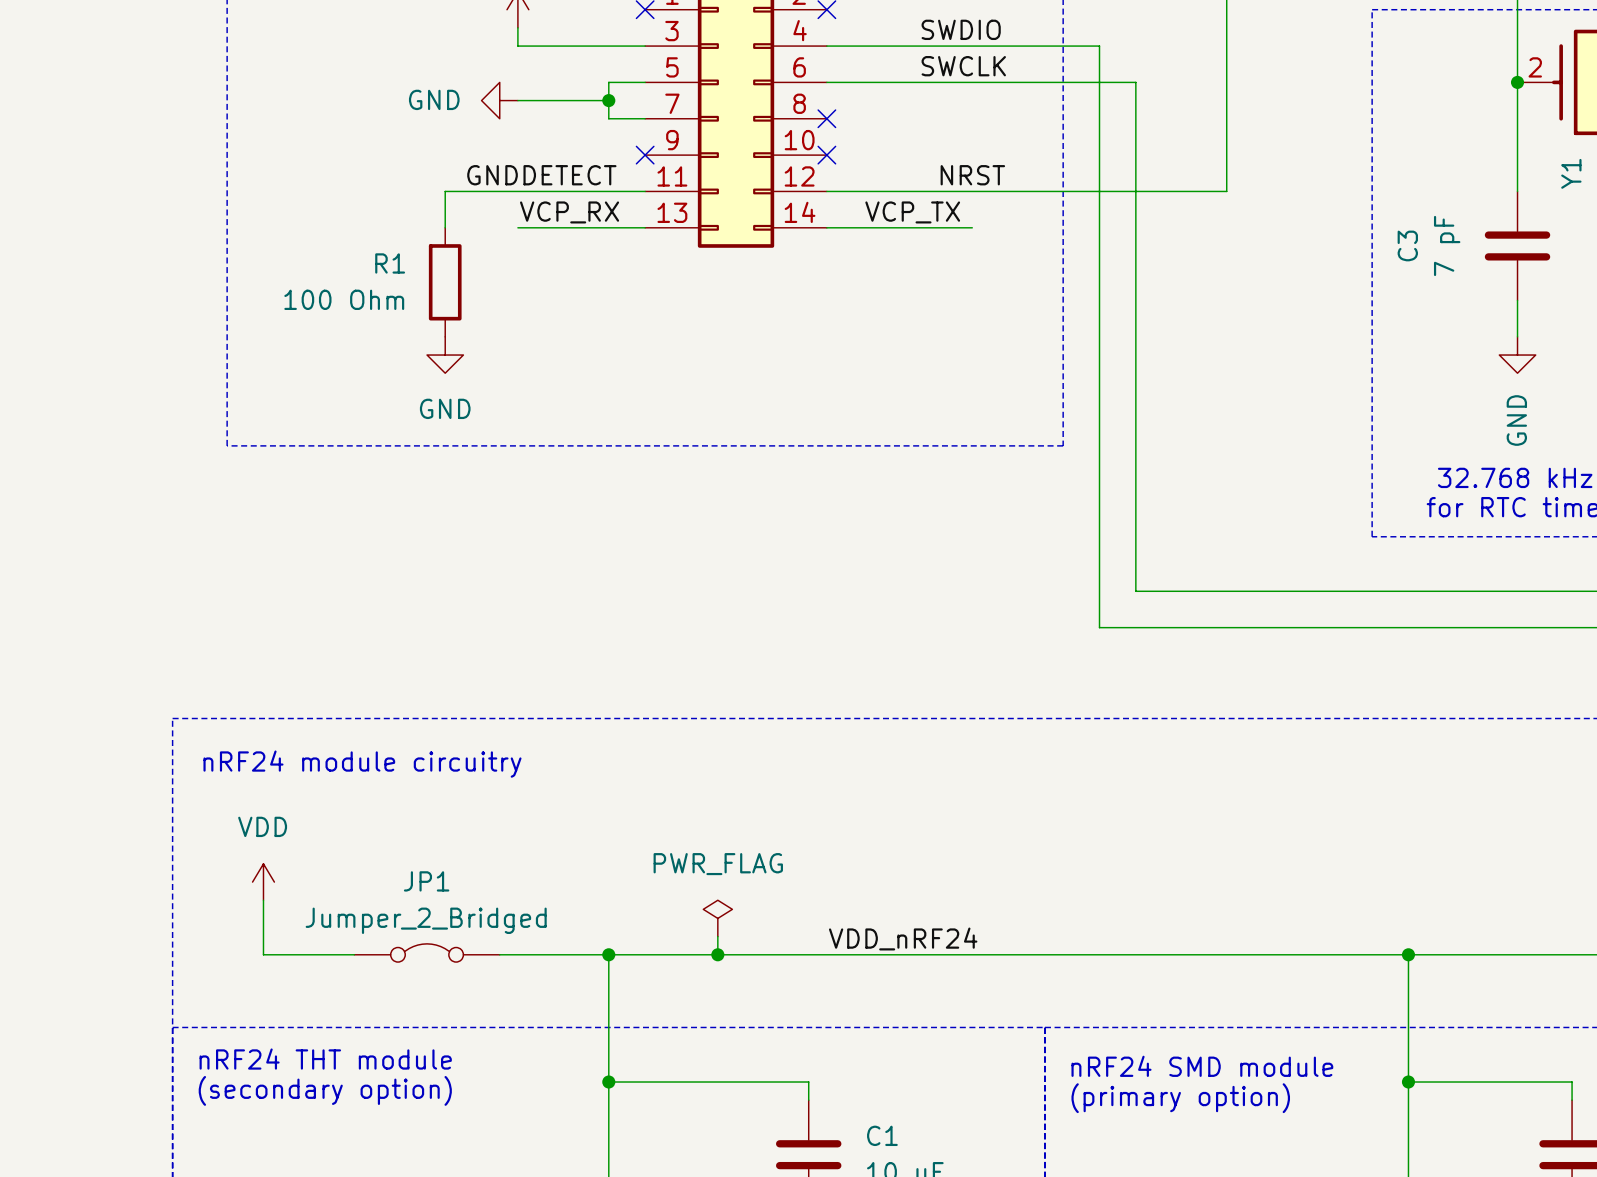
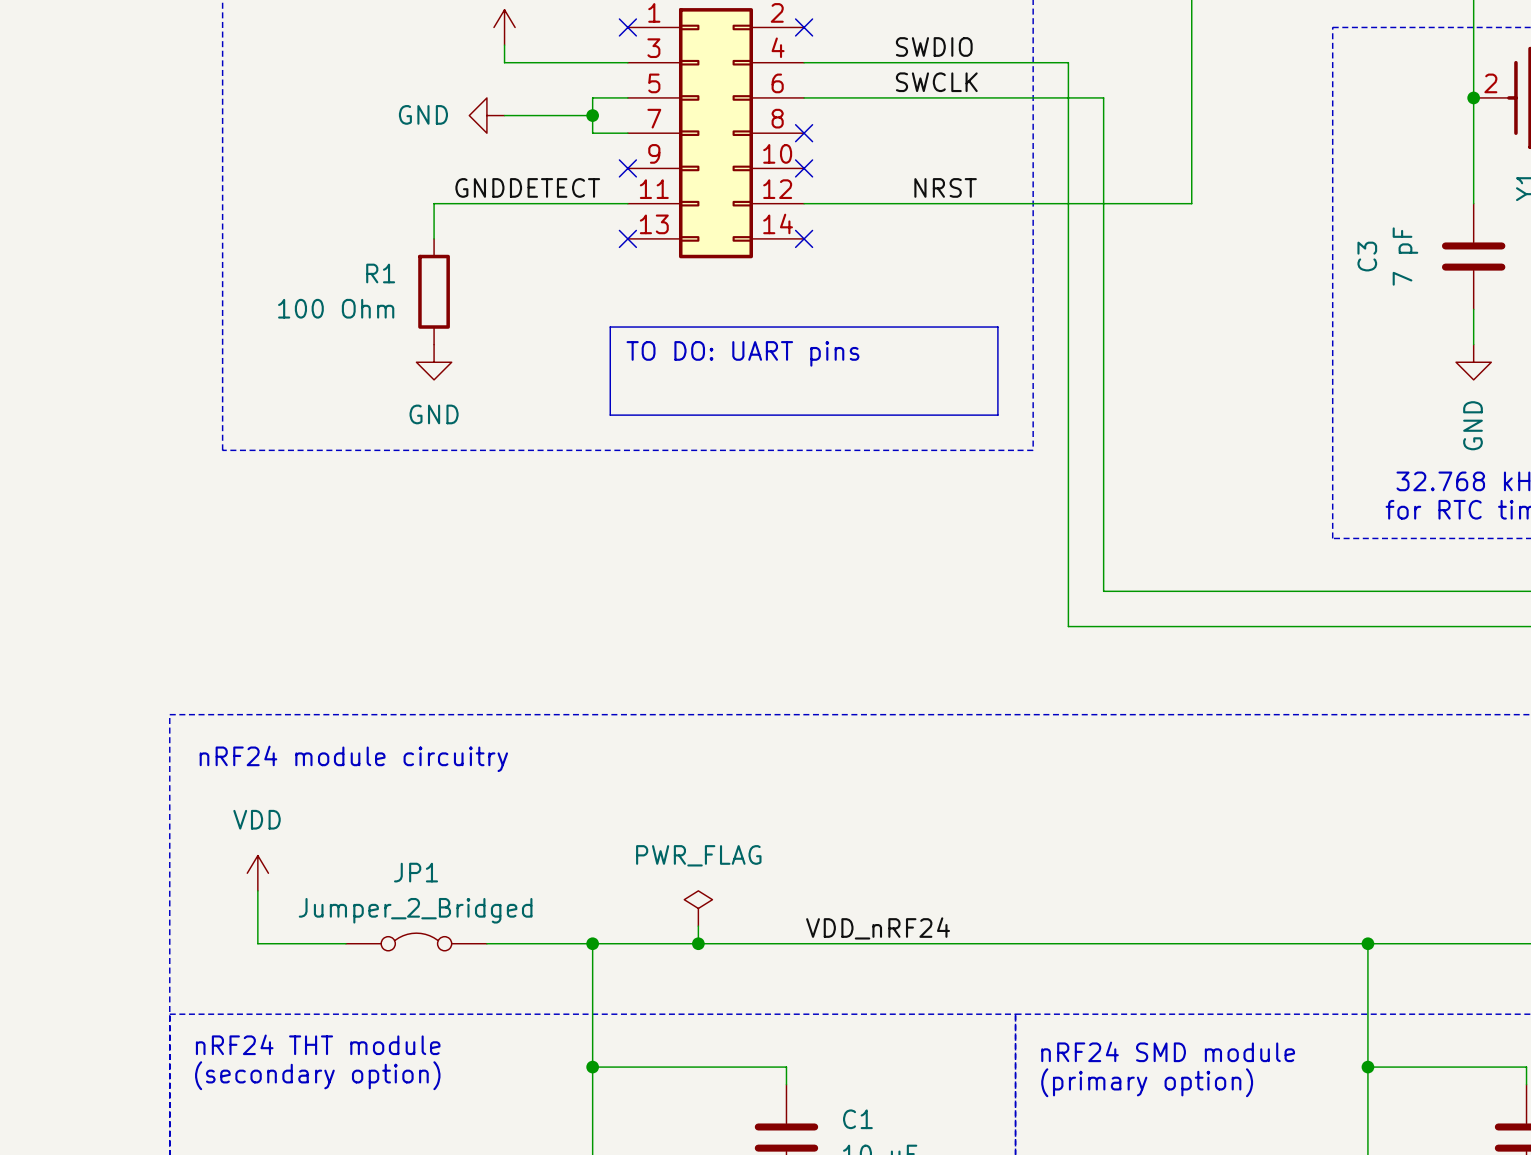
label: VCP_RX (569, 212) -> none
label: VCP_TX (912, 212) -> none
wire: (517, 227) (645, 227) -> none
no-connect mark: none -> (627, 238)
wire: (826, 227) (972, 227) -> none
no-connect mark: none -> (804, 238)
line: none -> (610, 327) (997, 327) (997, 415) (610, 415) (610, 327)
text: none -> TO DO: UART pins (742, 353)

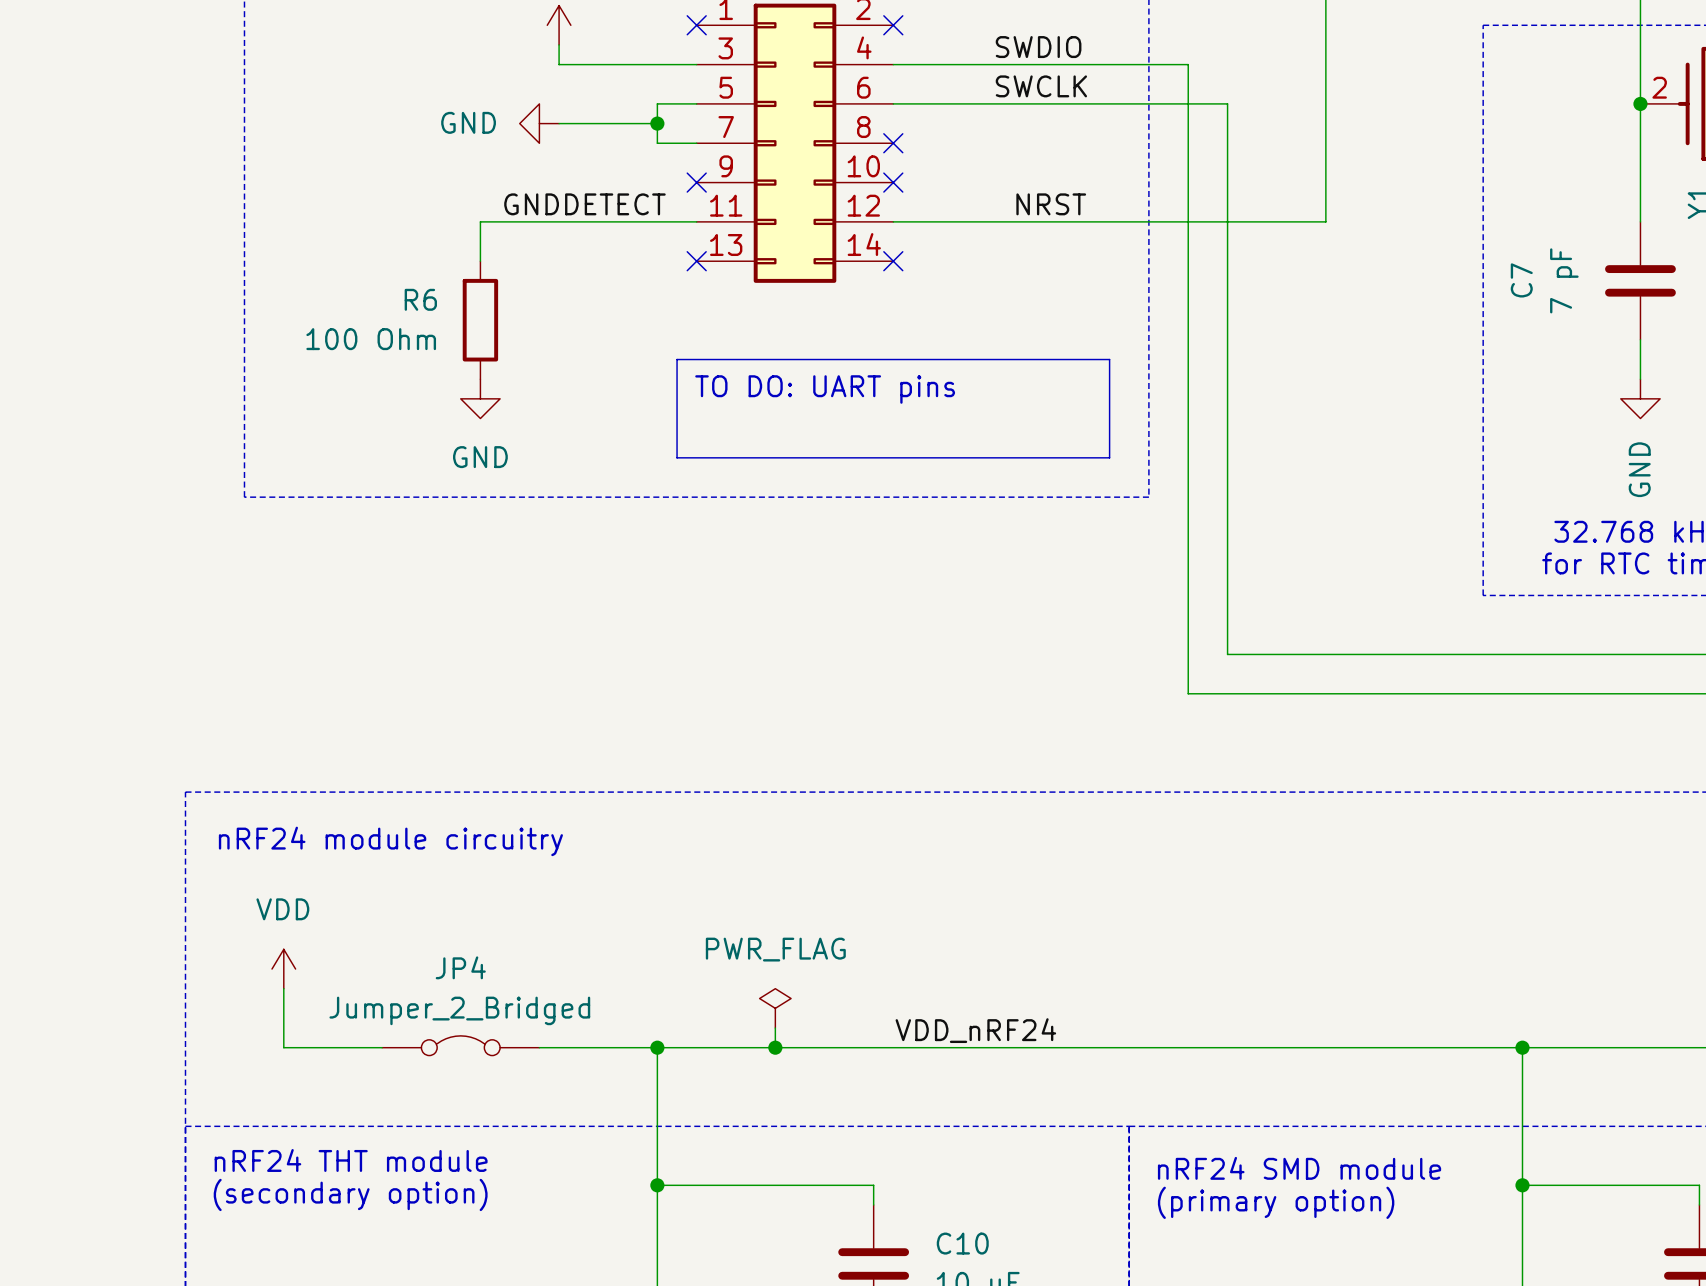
C3 name: C3 (1367, 256) -> C7 (1521, 280)
R1 name: R1 (380, 273) -> R6 (420, 299)
JP1 name: JP1 (416, 872) -> JP4 (460, 967)
C1 name: C1 (857, 1119) -> C10 (962, 1243)

